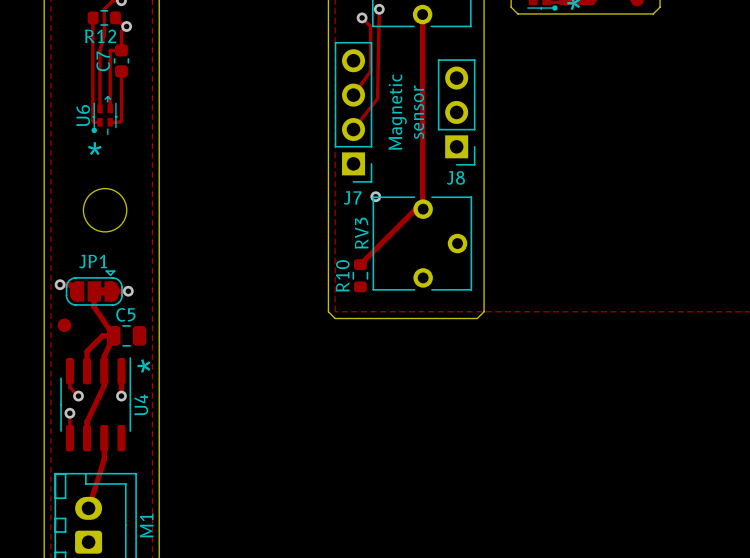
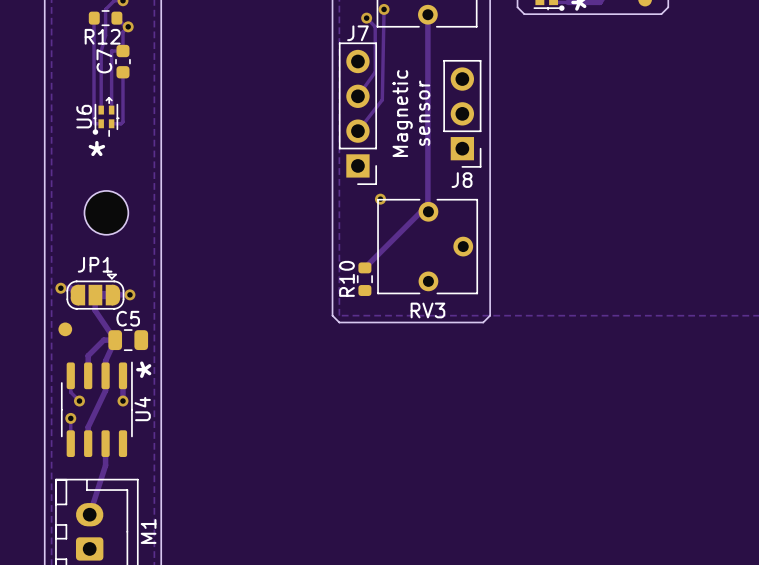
J7 name position: J7 (352, 197) -> J7 (357, 33)
RV3 name rotation: 0° (361, 233) -> 90° clockwise (427, 310)
RV3 name position: RV3 (361, 233) -> RV3 (427, 310)

